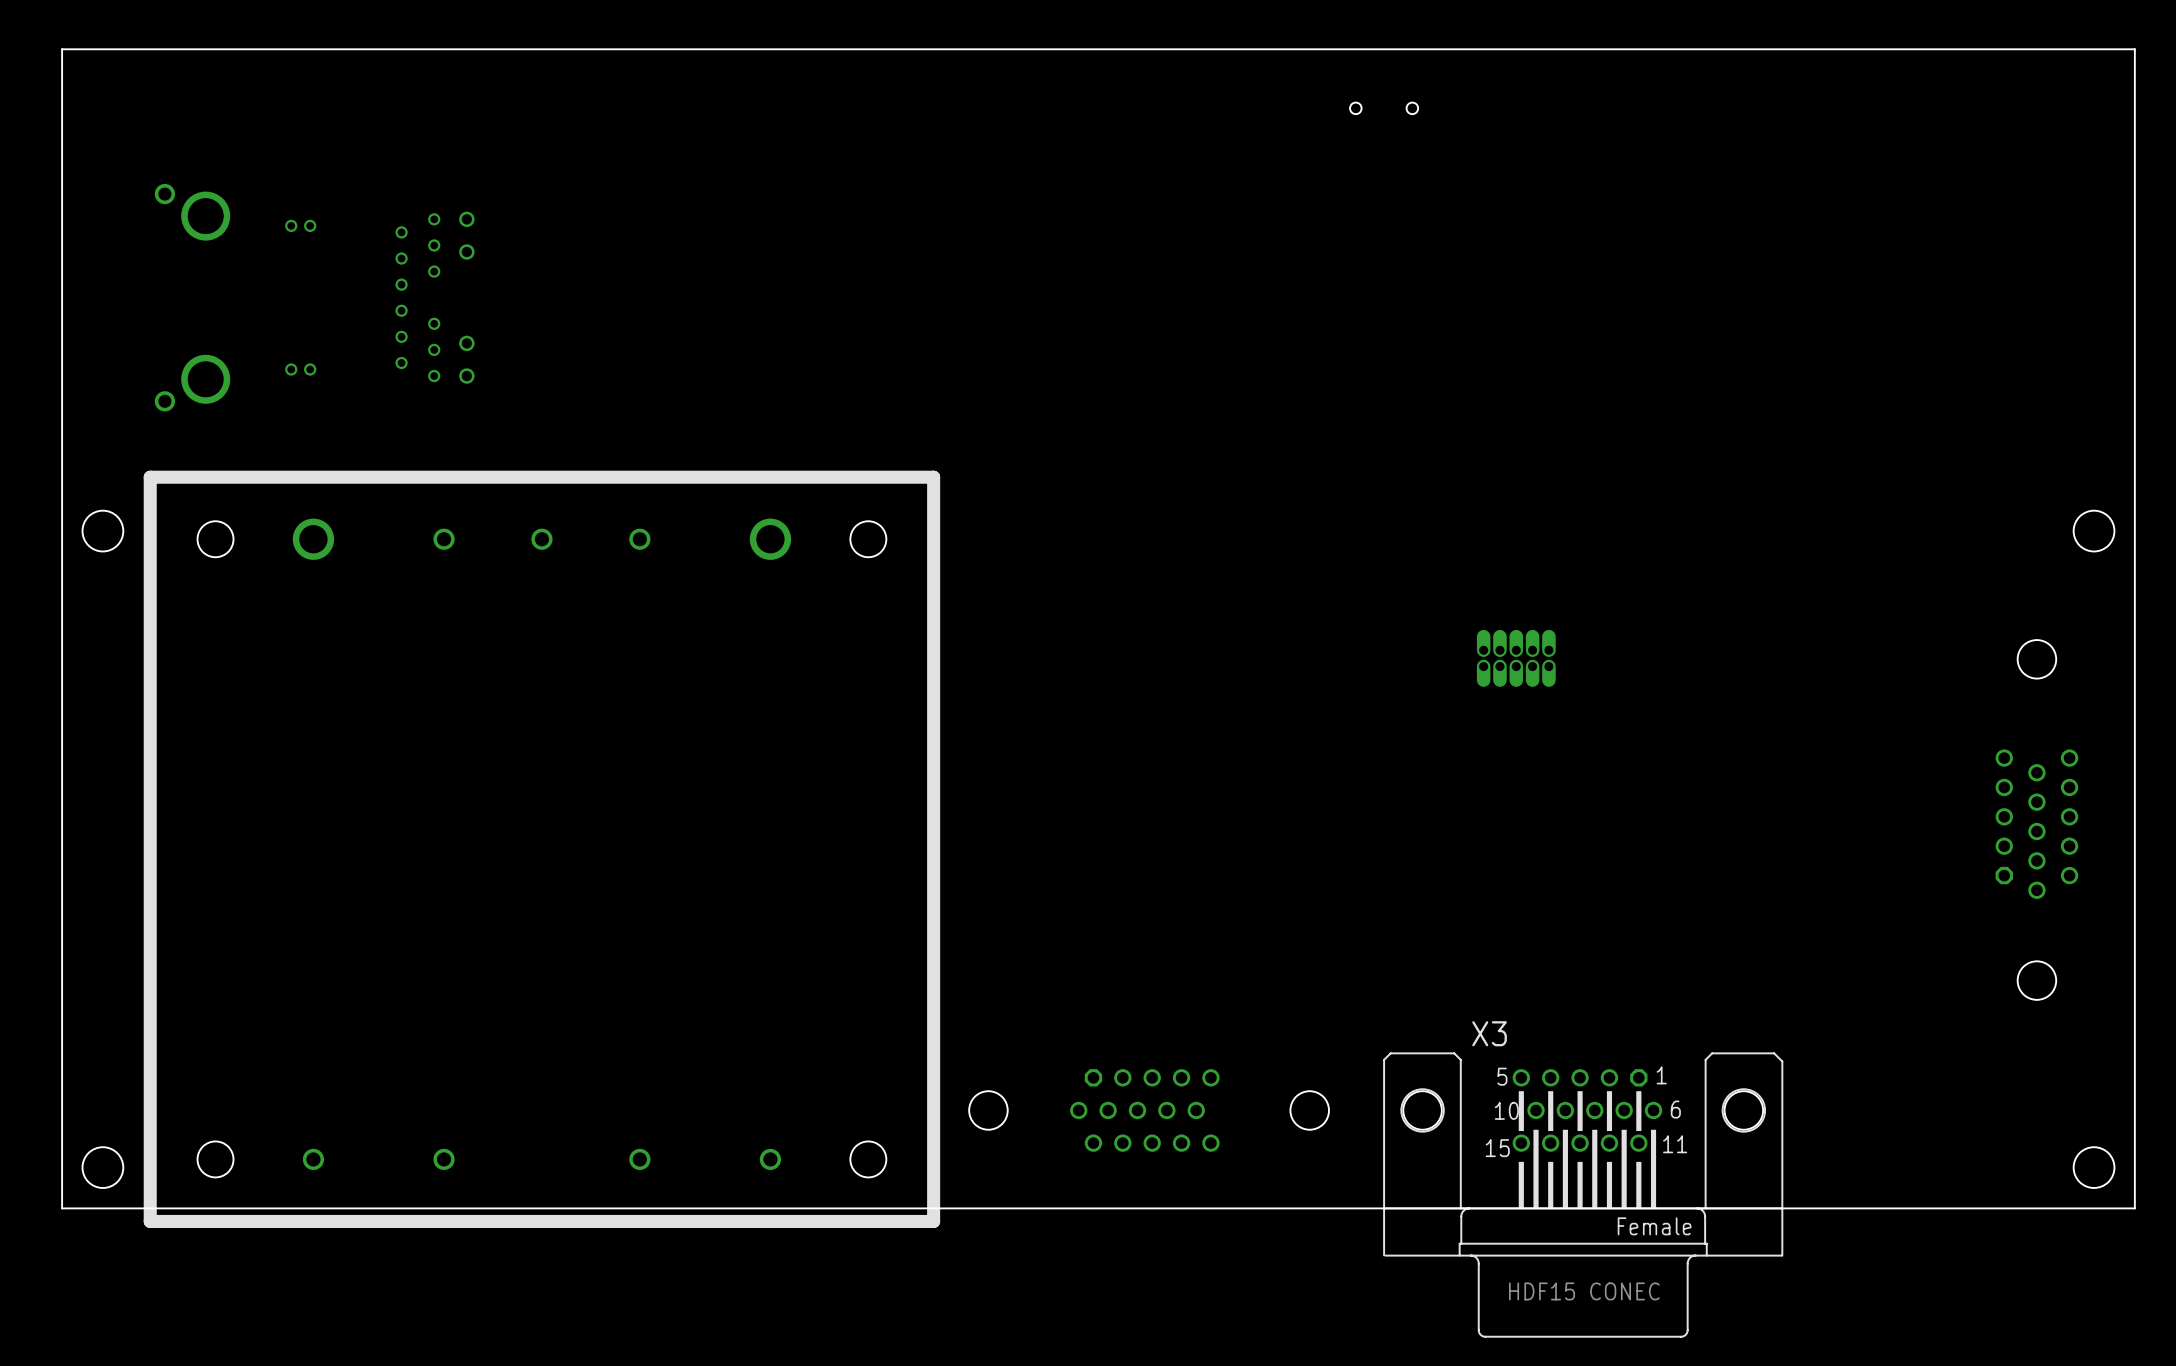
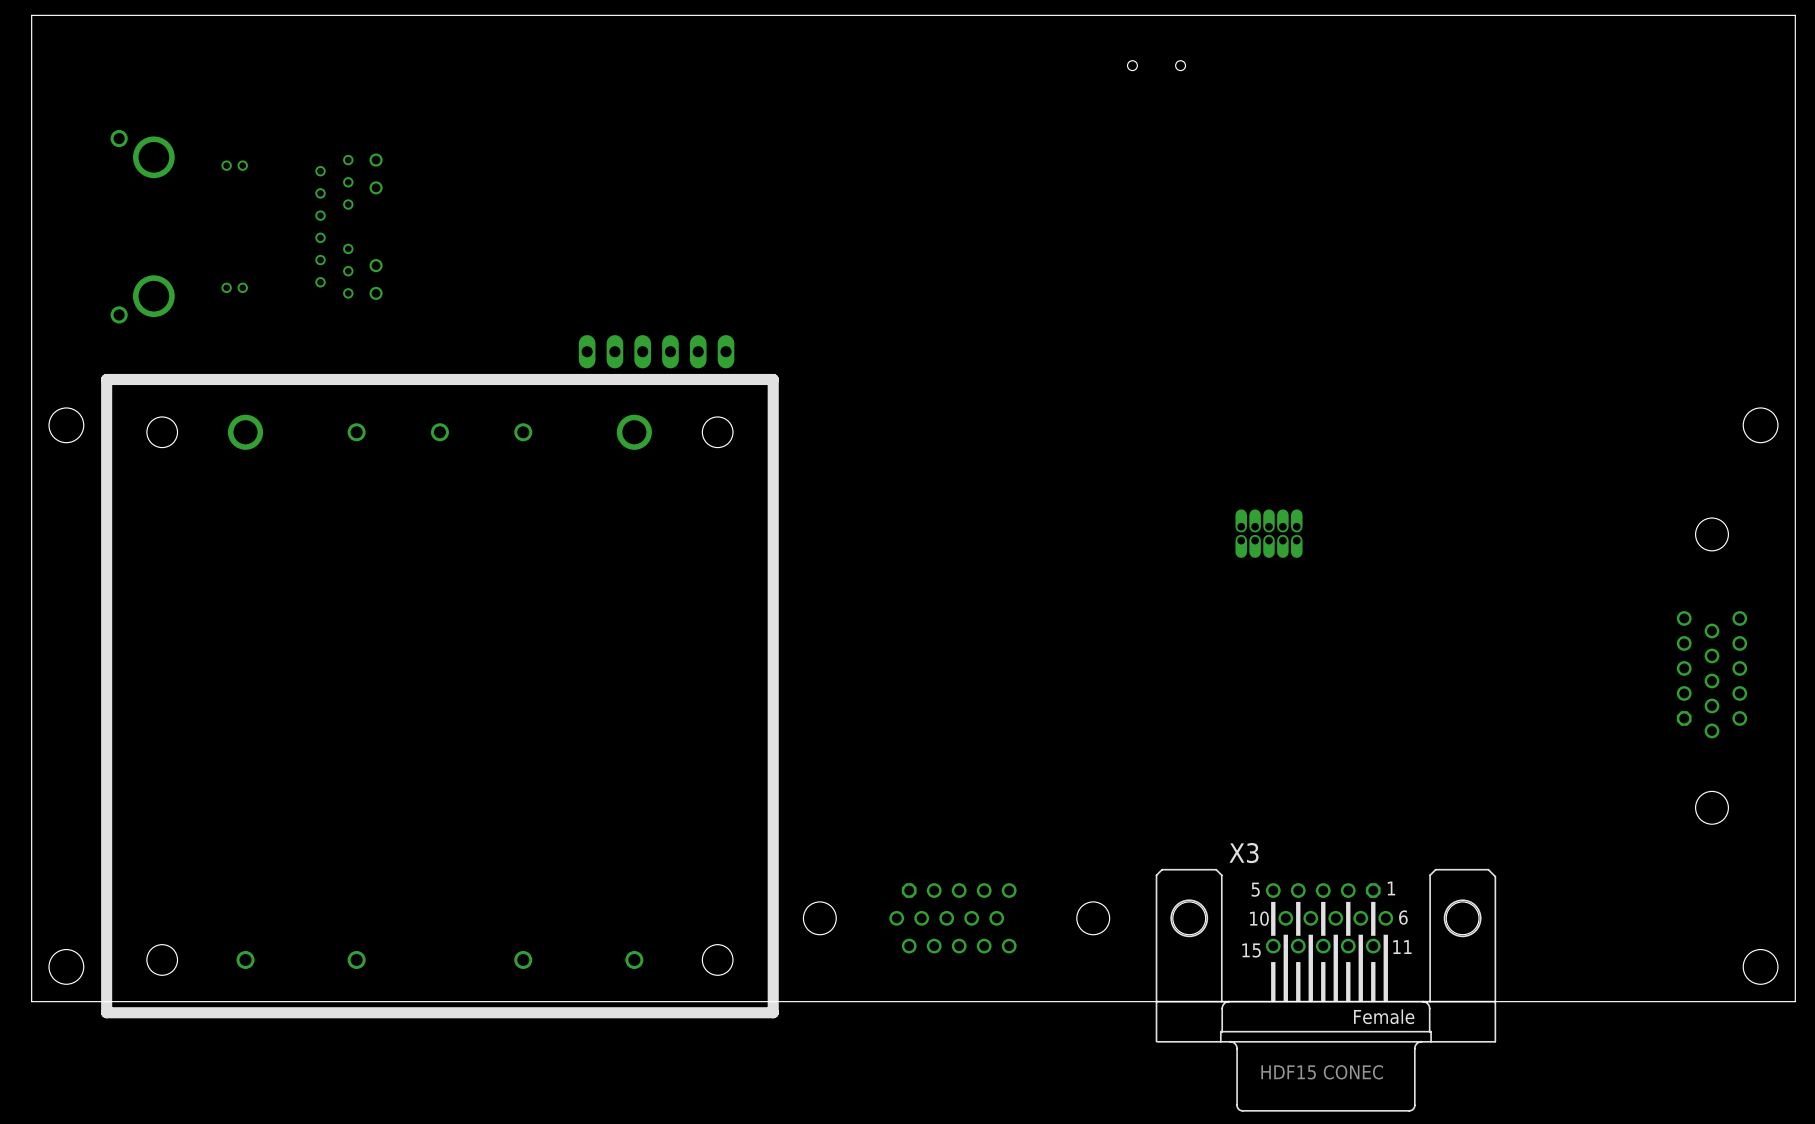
part: none -> (656, 351)

